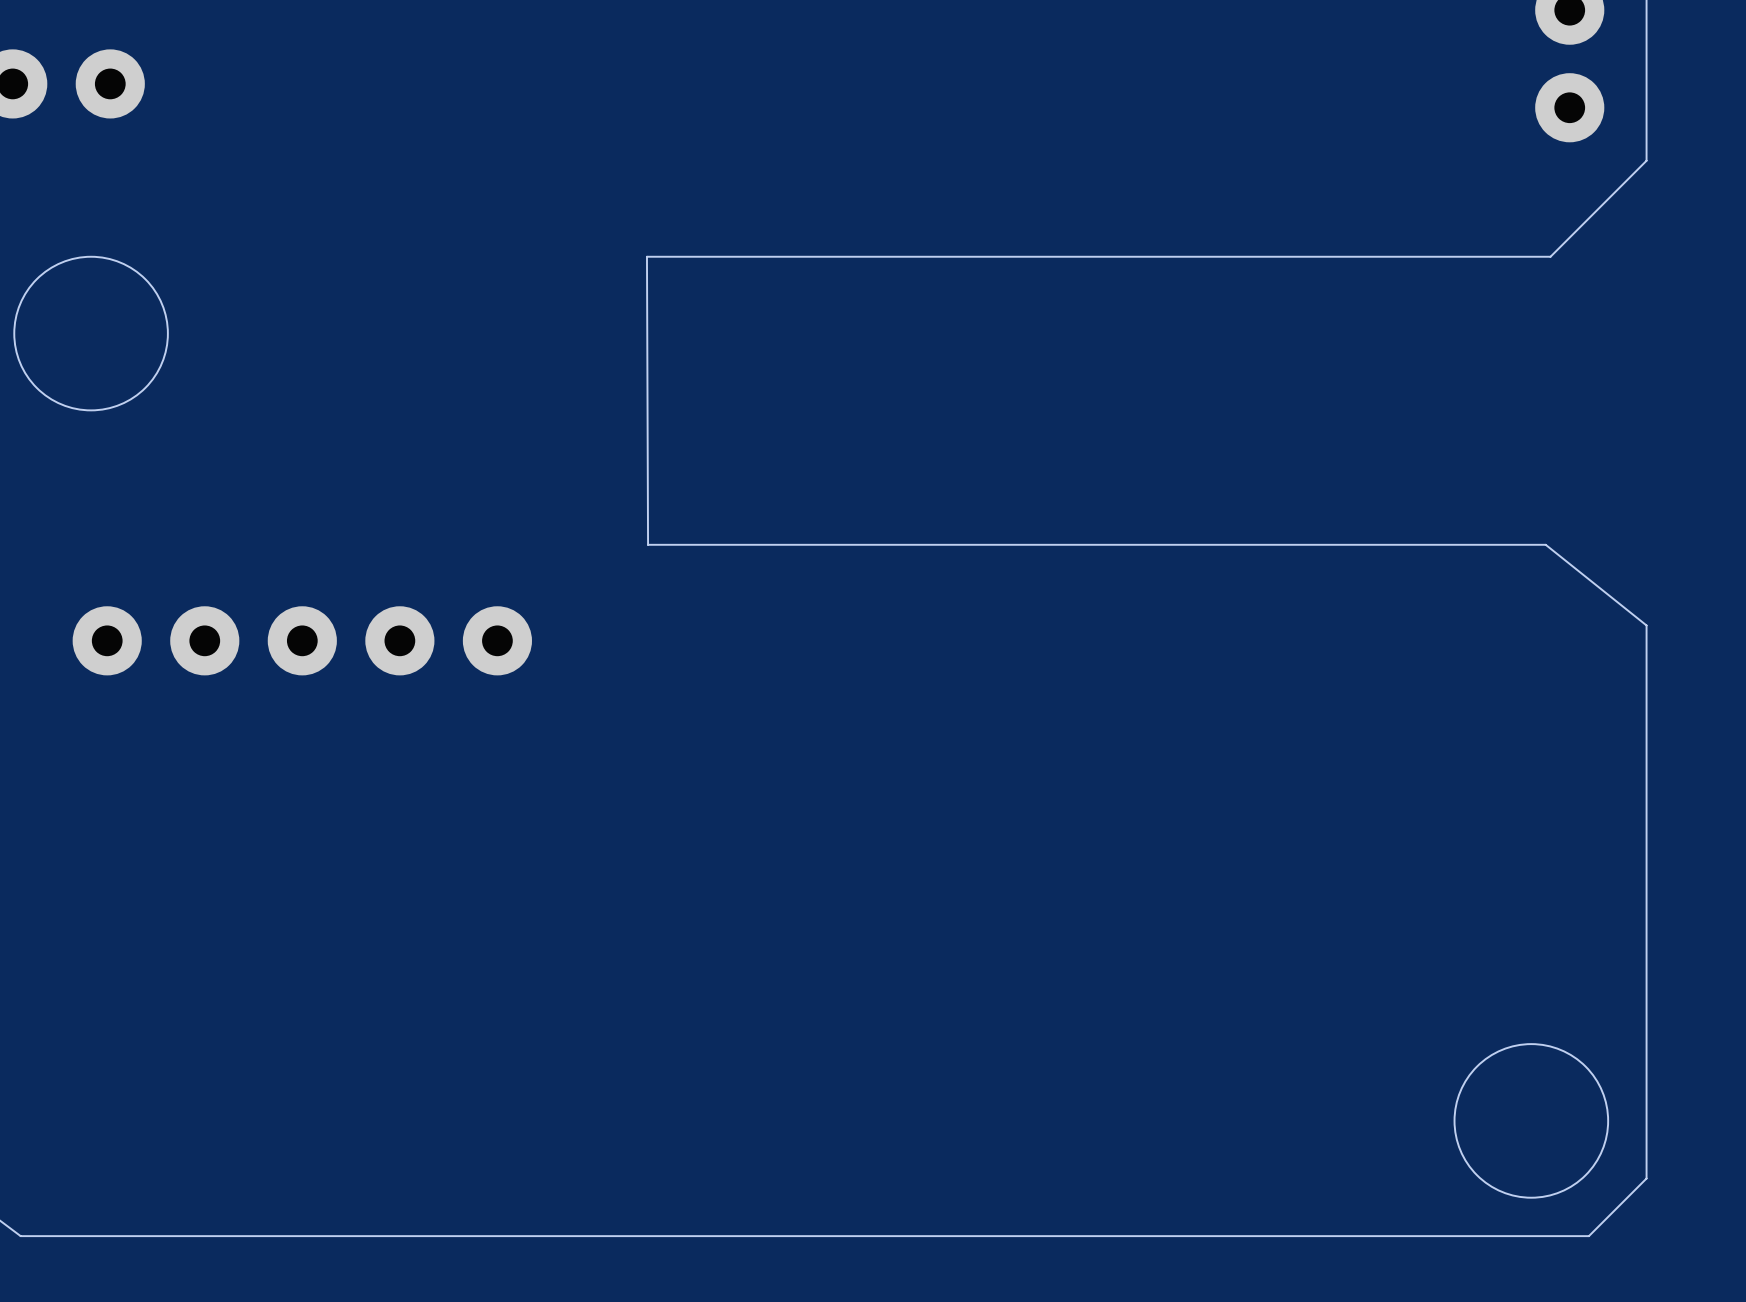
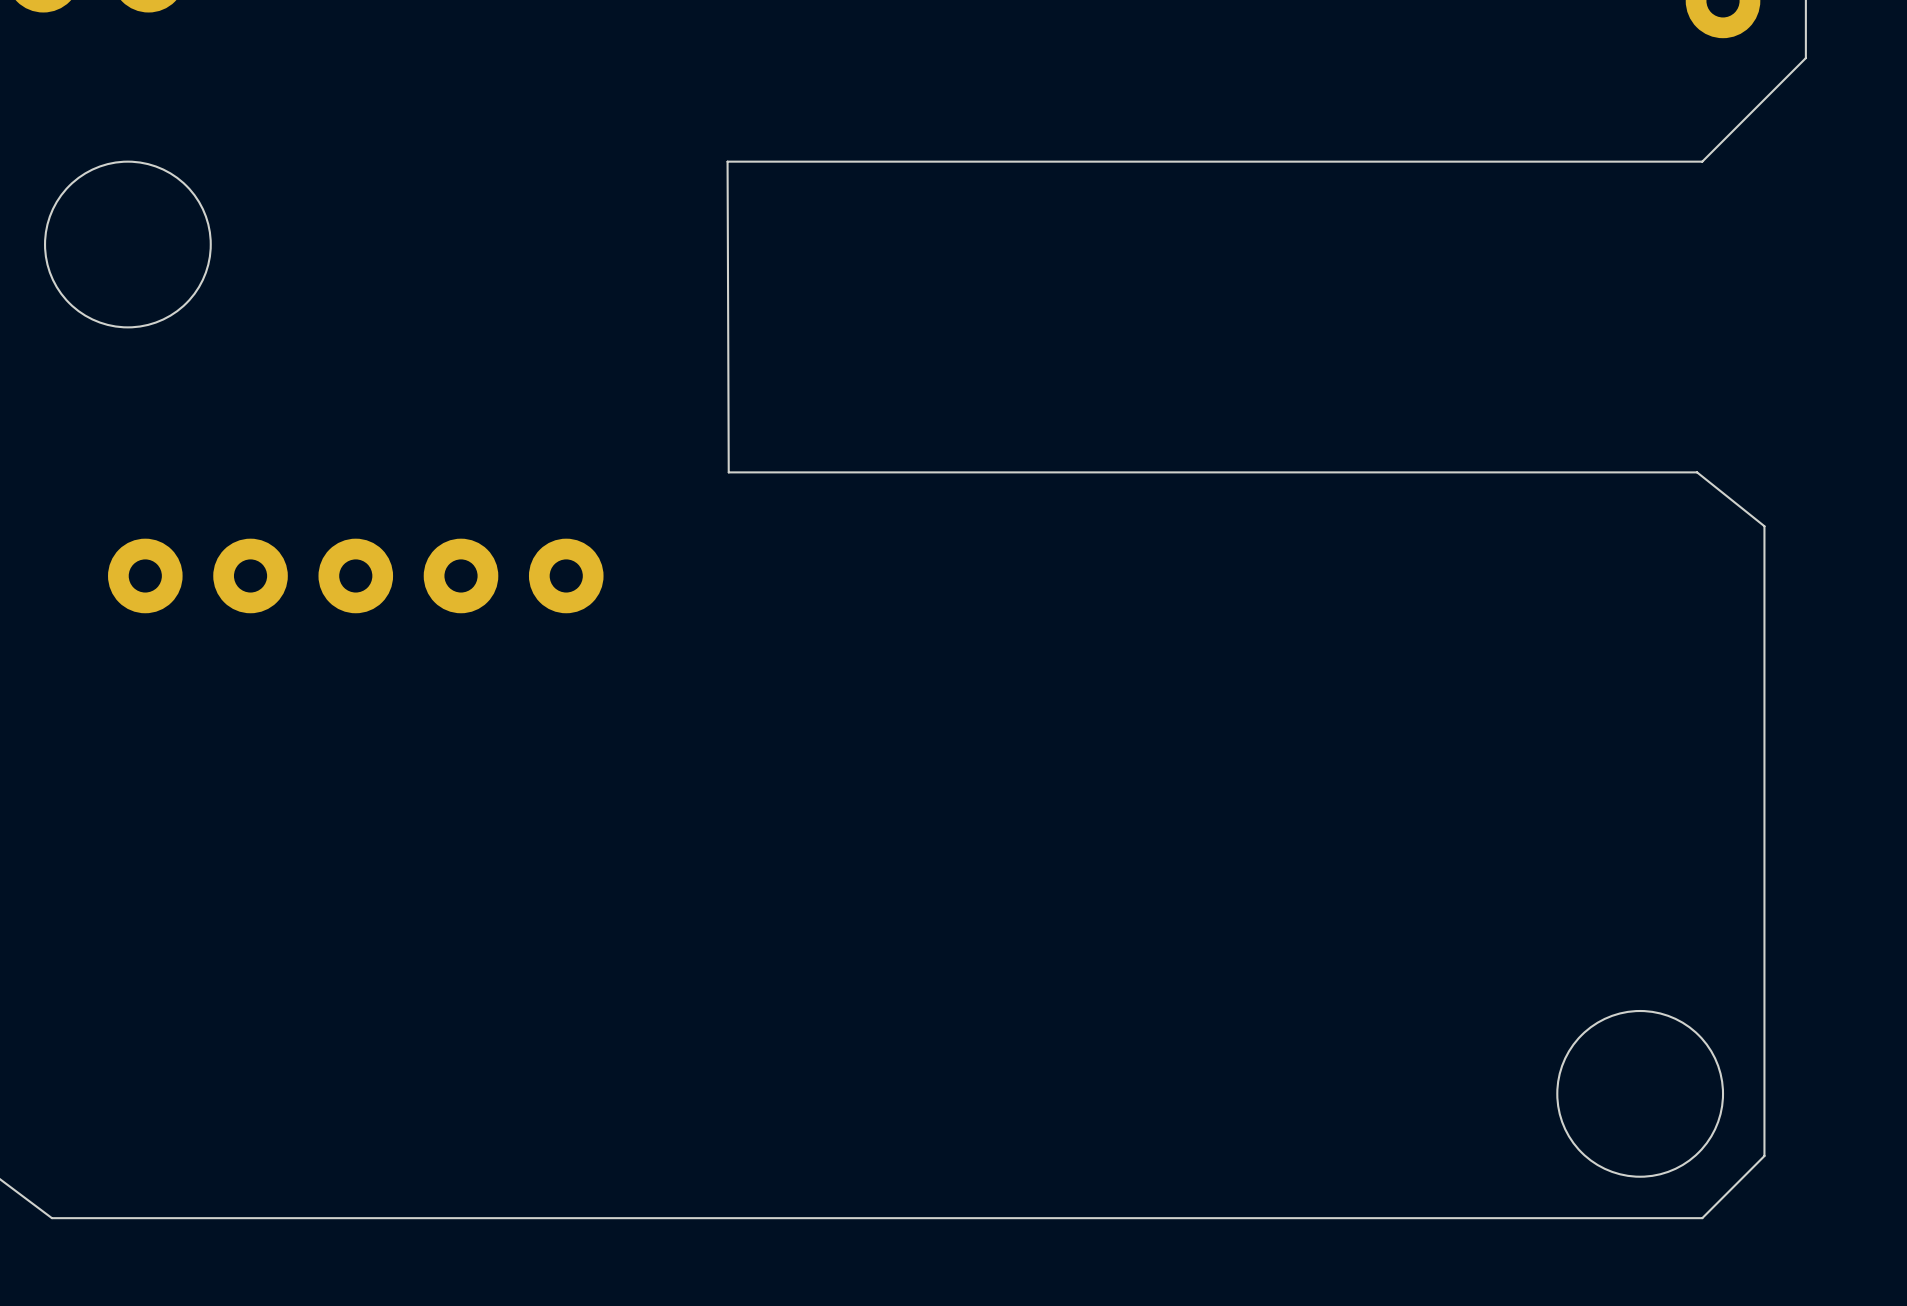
board edge: (1608, 594) (1646, 625) (1646, 1178) (1588, 1236) (1550, 1236) -> (1764, 526) (1764, 1156) (1702, 1218)
round board edge position: (1531, 1120) -> (1640, 1093)

